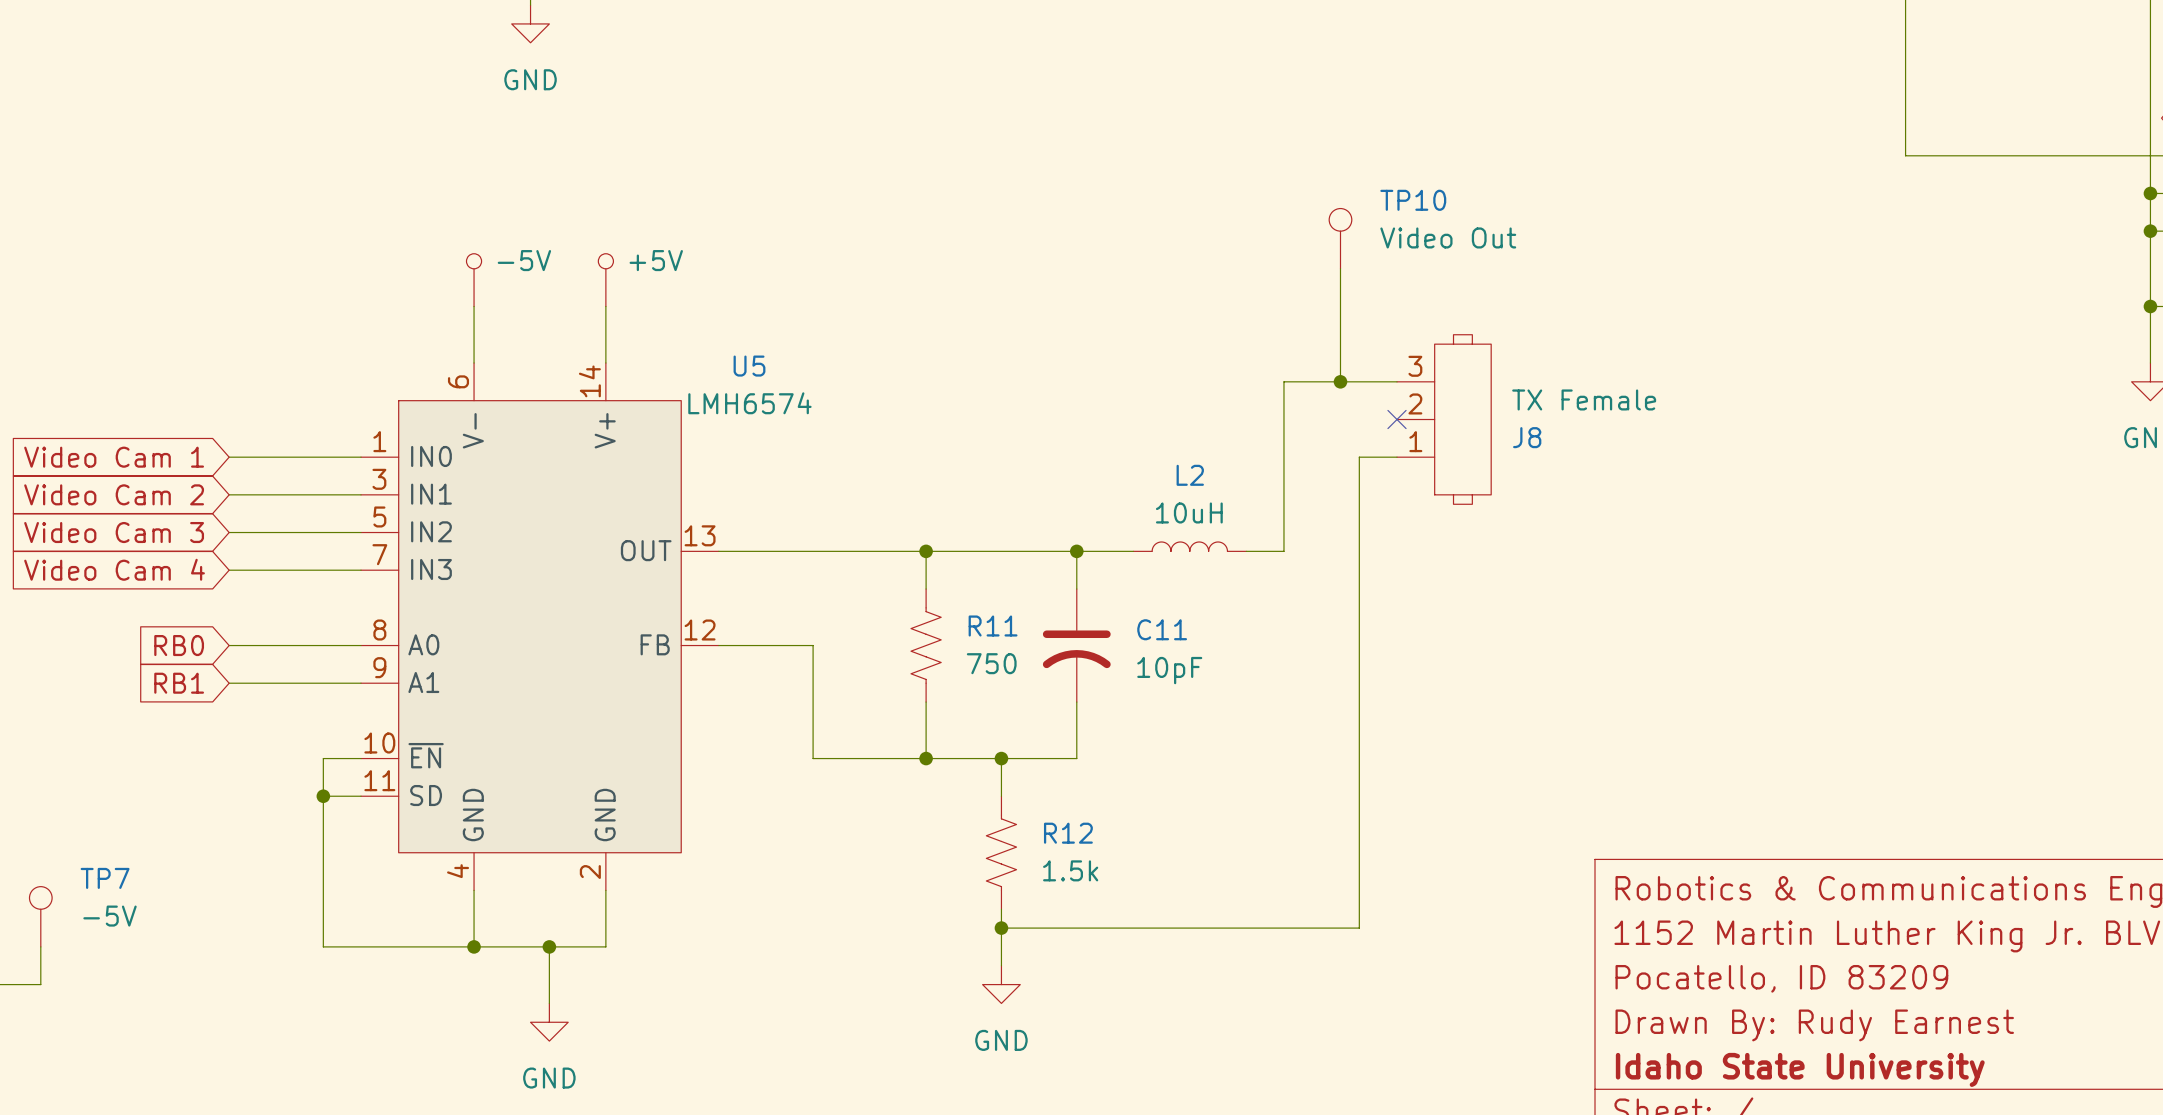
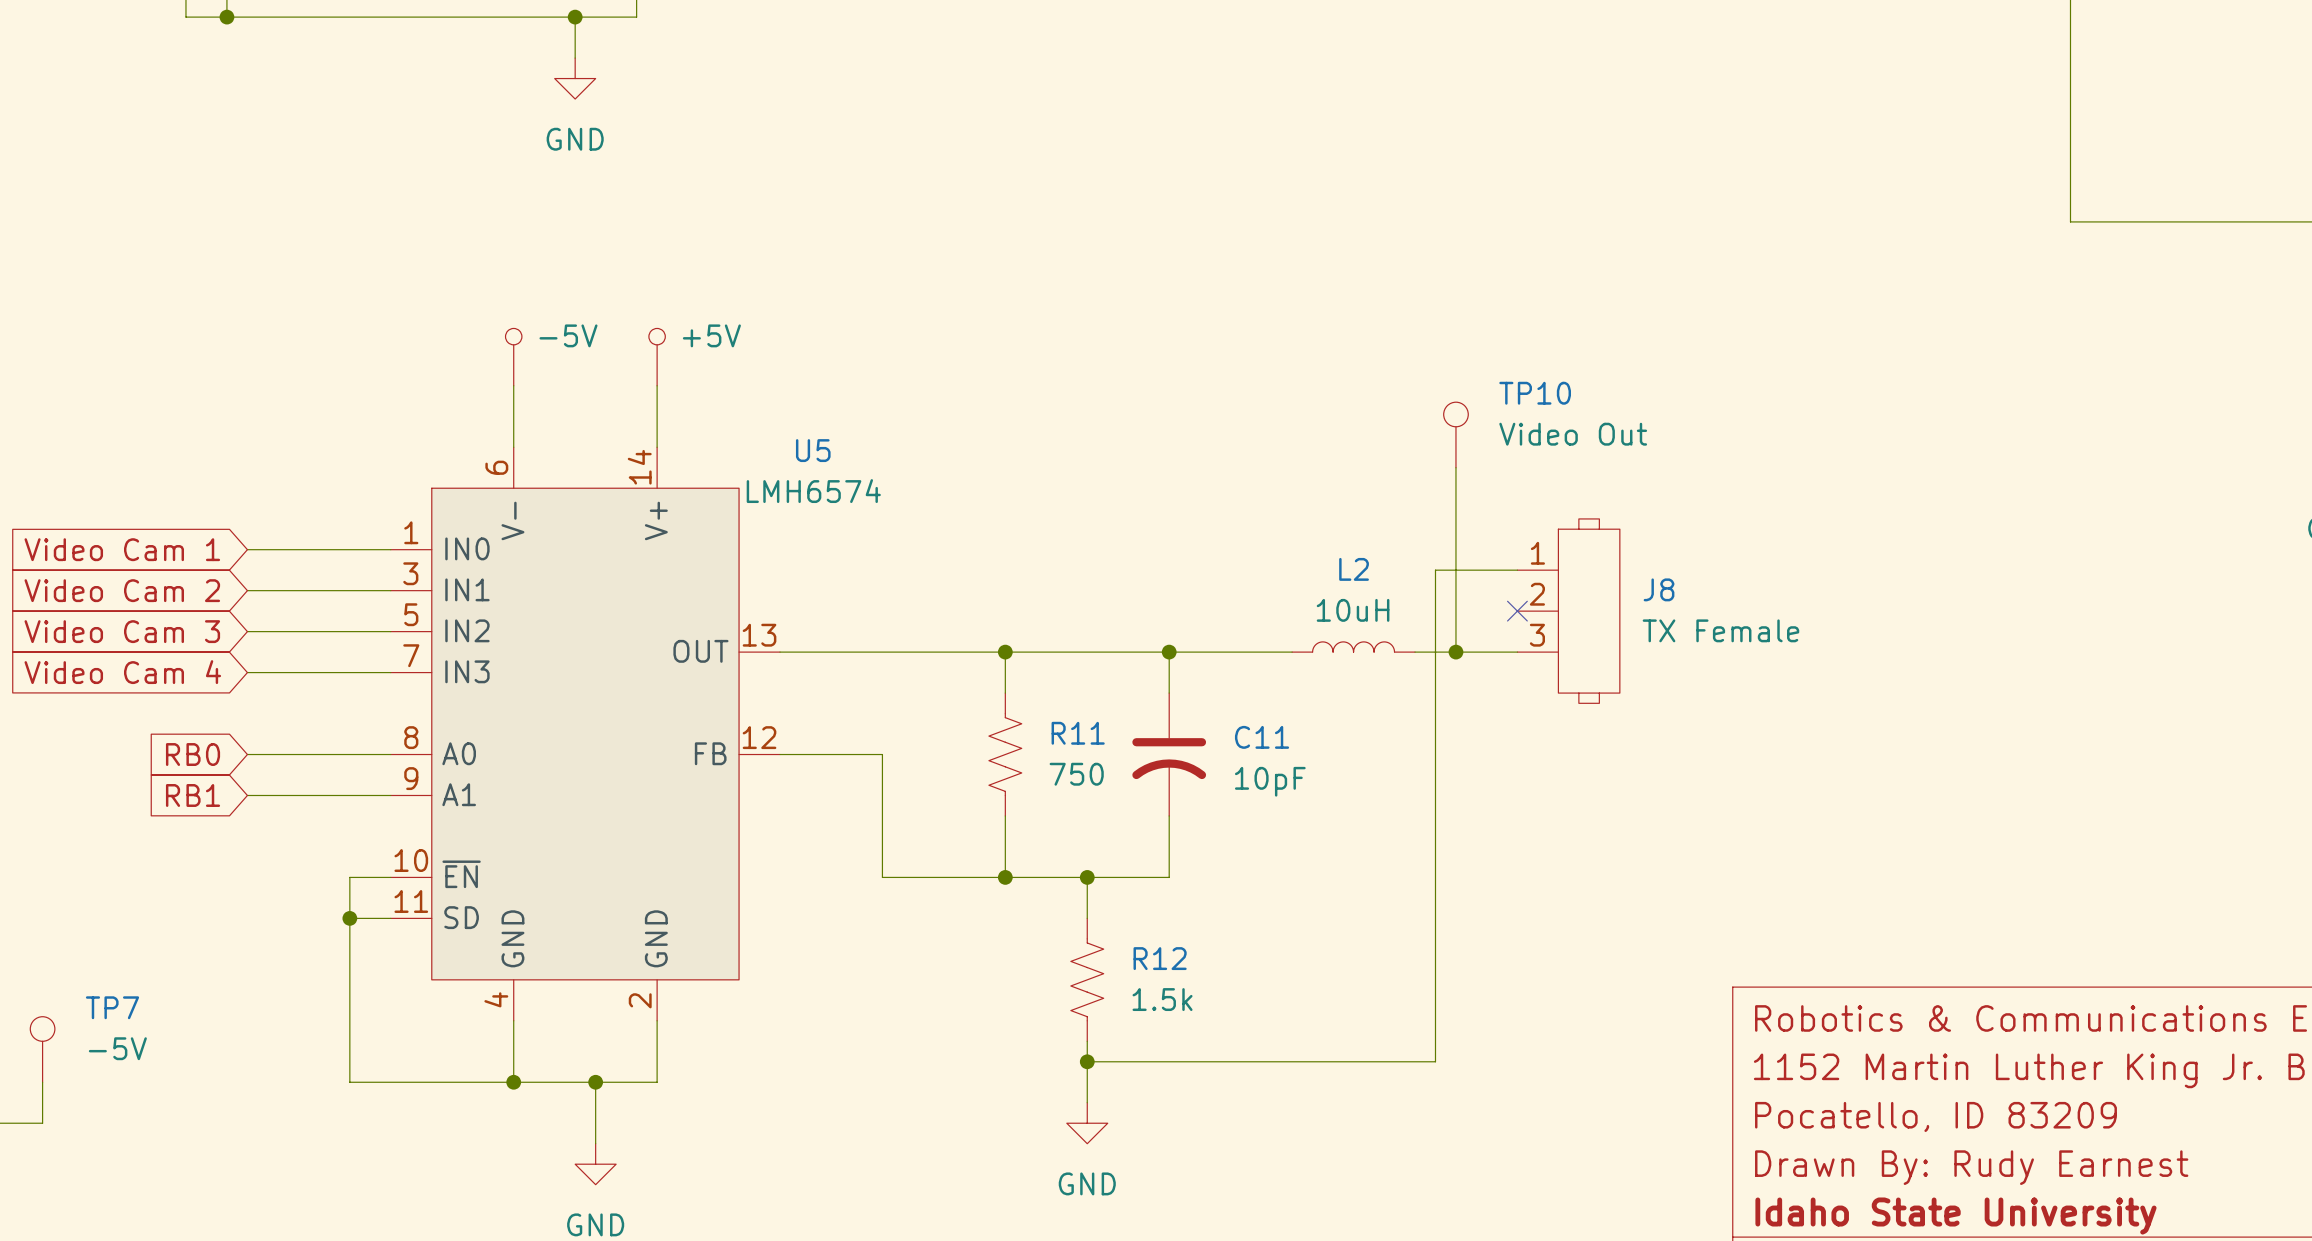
TP10 position: (1340, 238) -> (1455, 434)
wire: (1340, 268) (1340, 381) -> (1455, 652) (1455, 467)
junction: (1340, 381) -> none
wire: (1397, 381) (1283, 381) (1283, 551) (1246, 551) -> none
no-connect mark: (1397, 419) -> none
J8 flip: as is (1462, 419) -> up-down (1589, 611)
wire: (1397, 457) (1359, 457) (1359, 928) (1321, 928) -> (1517, 570) (1435, 570) (1435, 1061)
no-connect mark: none -> (1517, 611)
L2 position: (1189, 546) -> (1353, 647)
wire: none -> (1230, 652) (1292, 652)
wire: none -> (1415, 652) (1517, 652)
junction: none -> (1455, 652)

